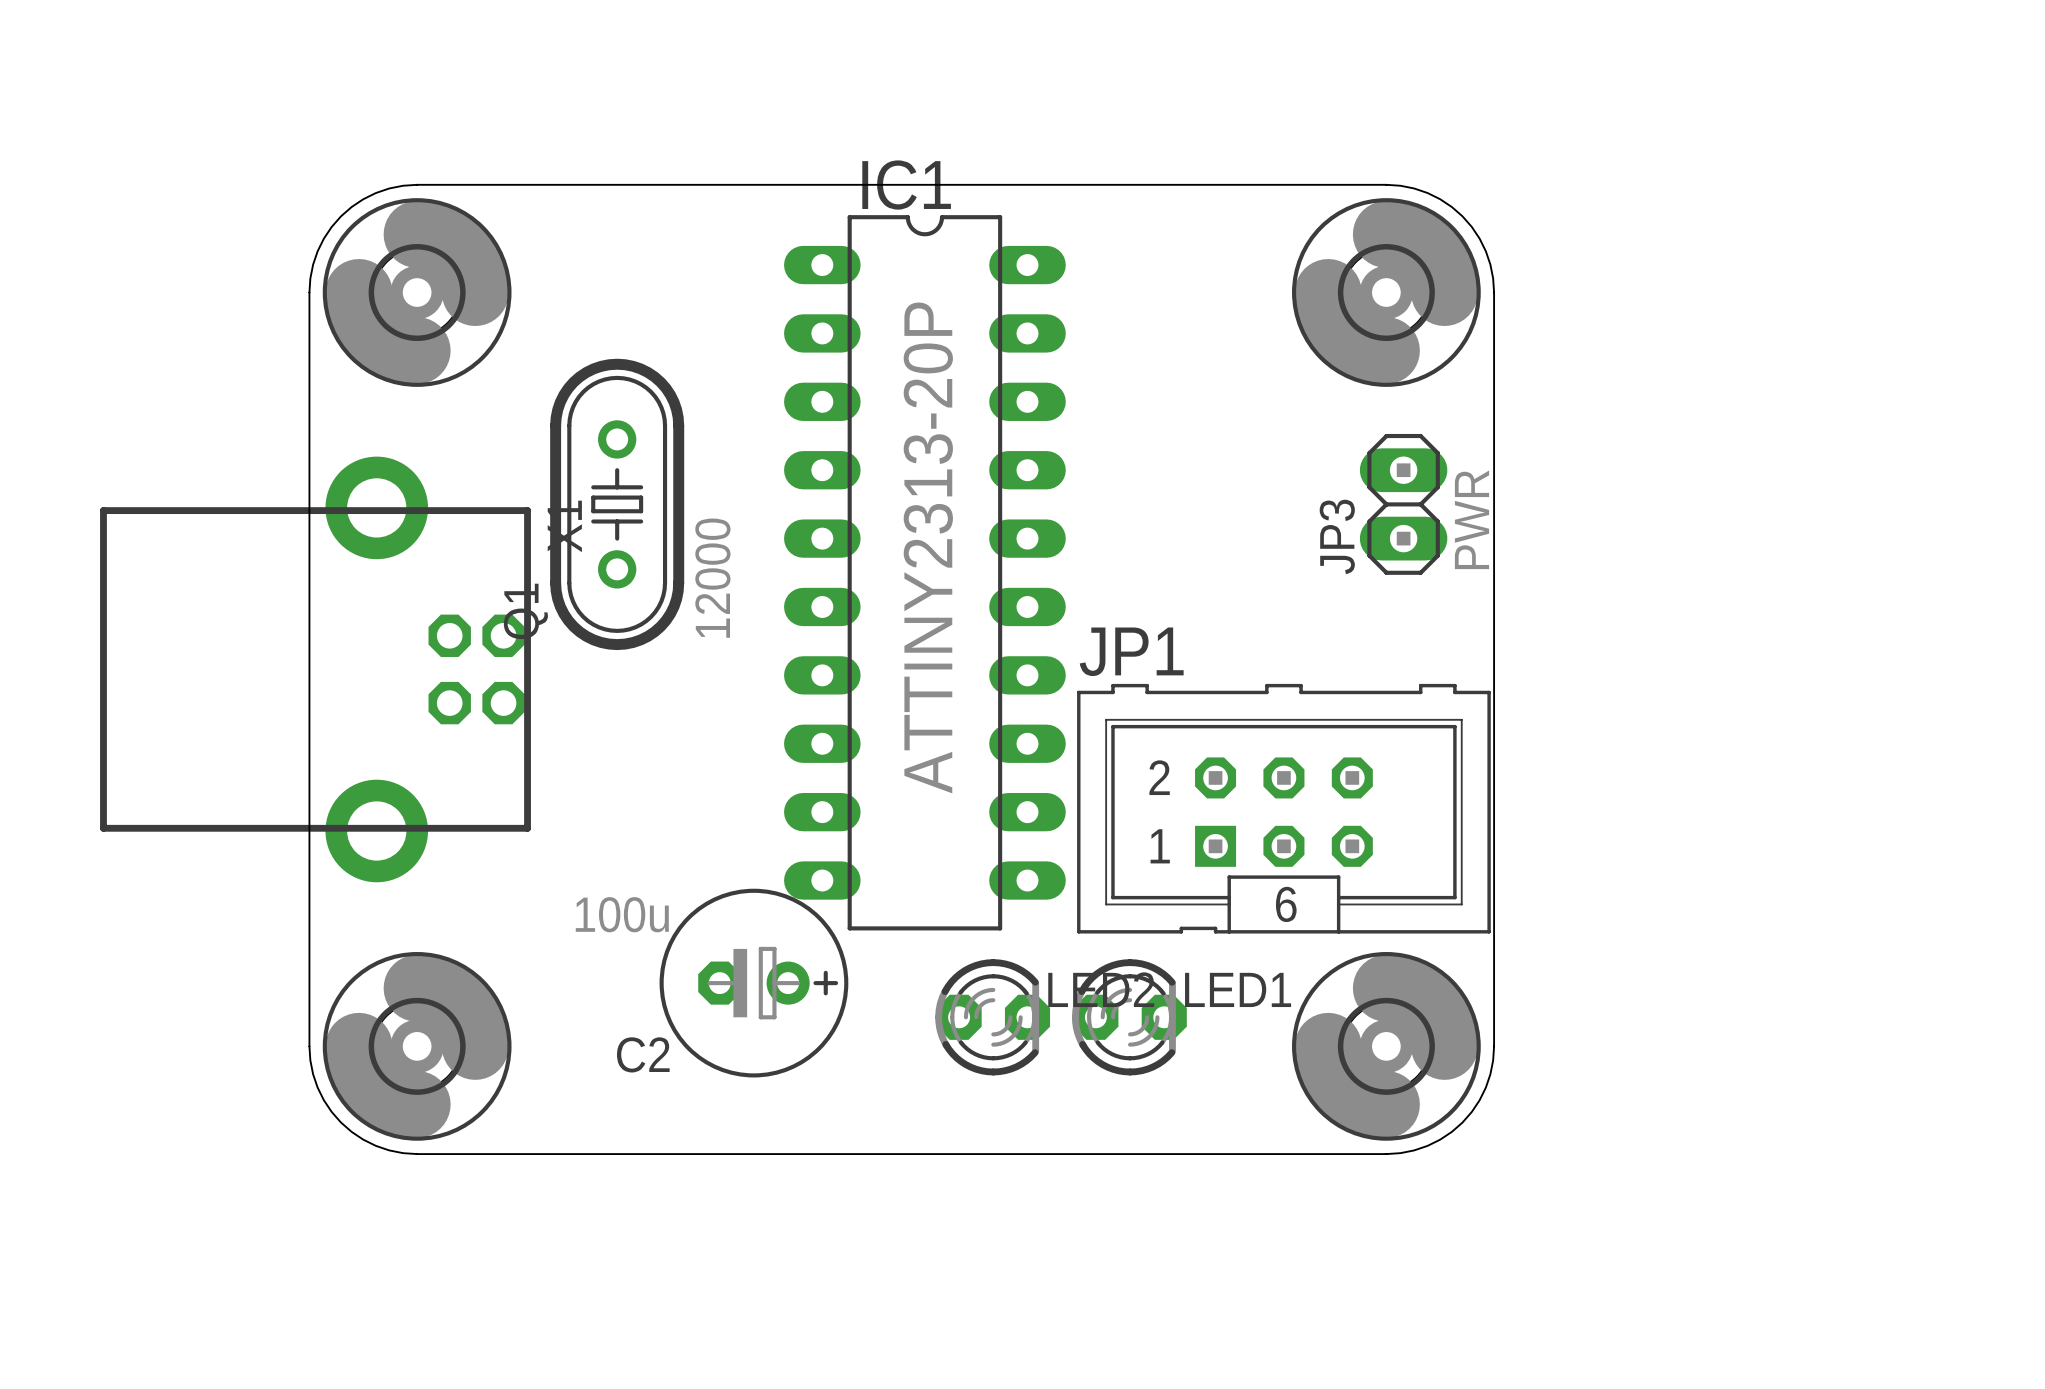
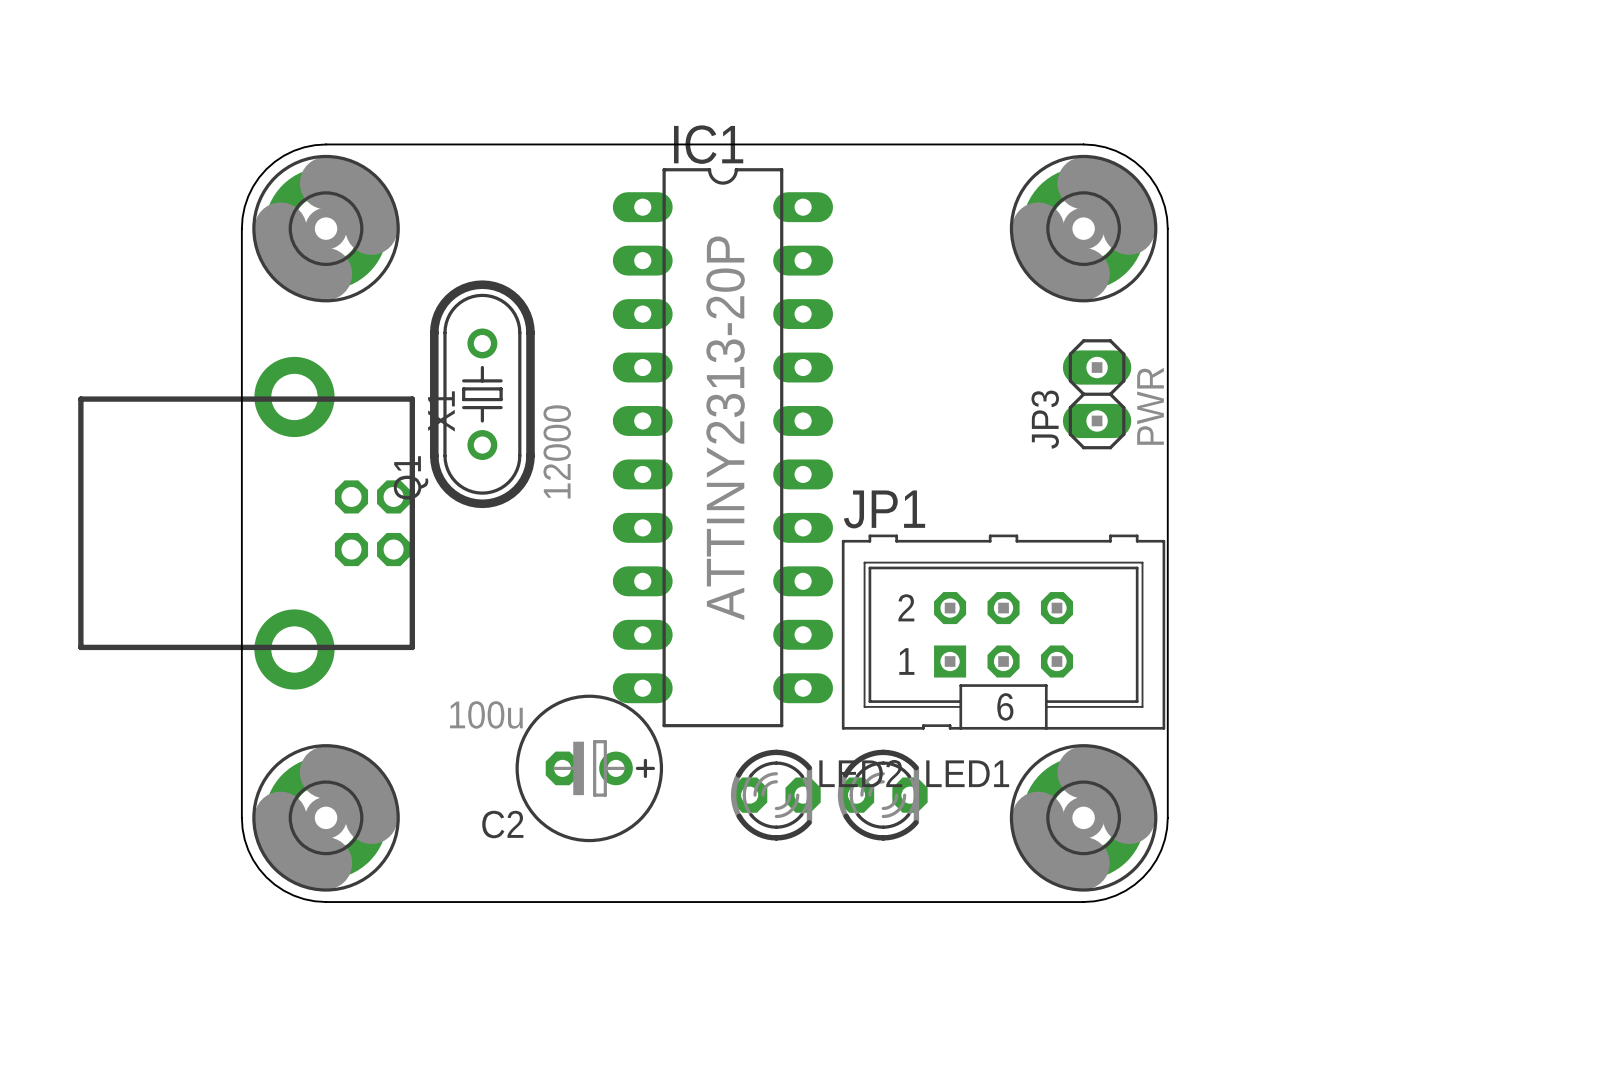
part footprint: [322, 198, 512, 387] -> [252, 154, 400, 303]
part footprint: [1292, 198, 1481, 387] -> [1009, 154, 1158, 303]
part footprint: [322, 952, 512, 1141] -> [252, 744, 400, 892]
part footprint: [1292, 952, 1481, 1141] -> [1009, 744, 1158, 892]

